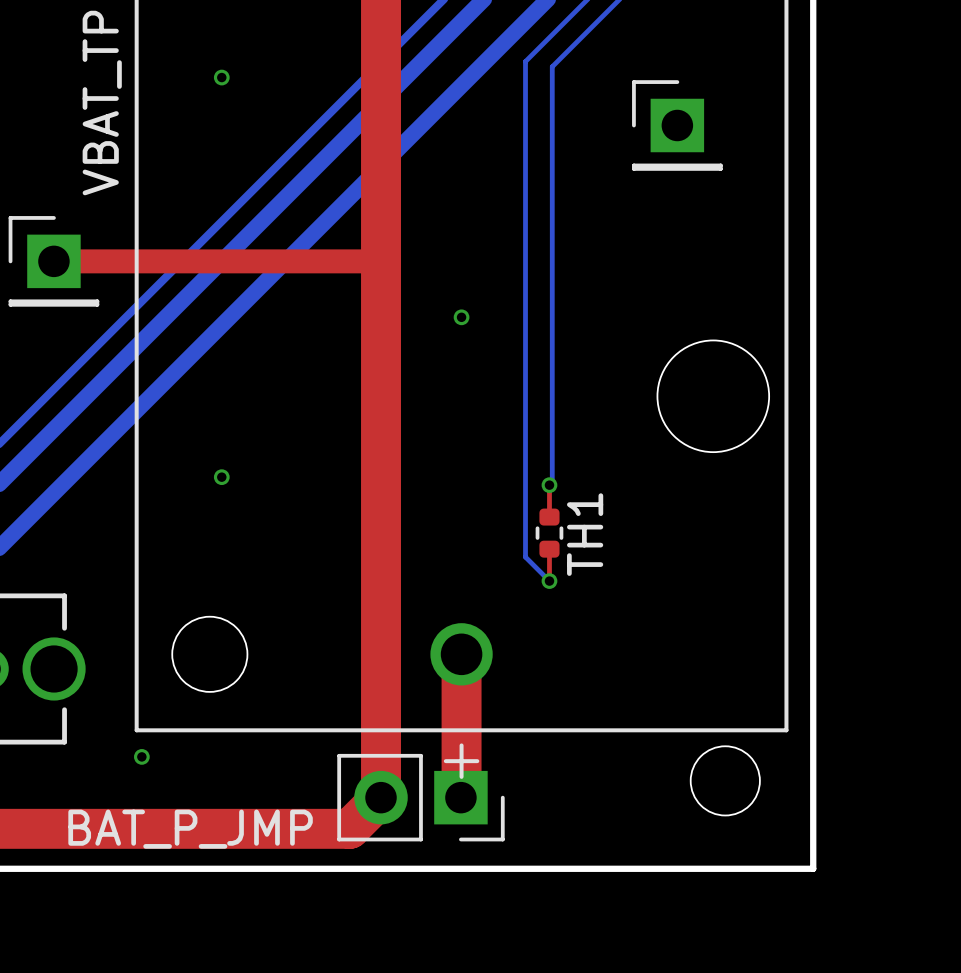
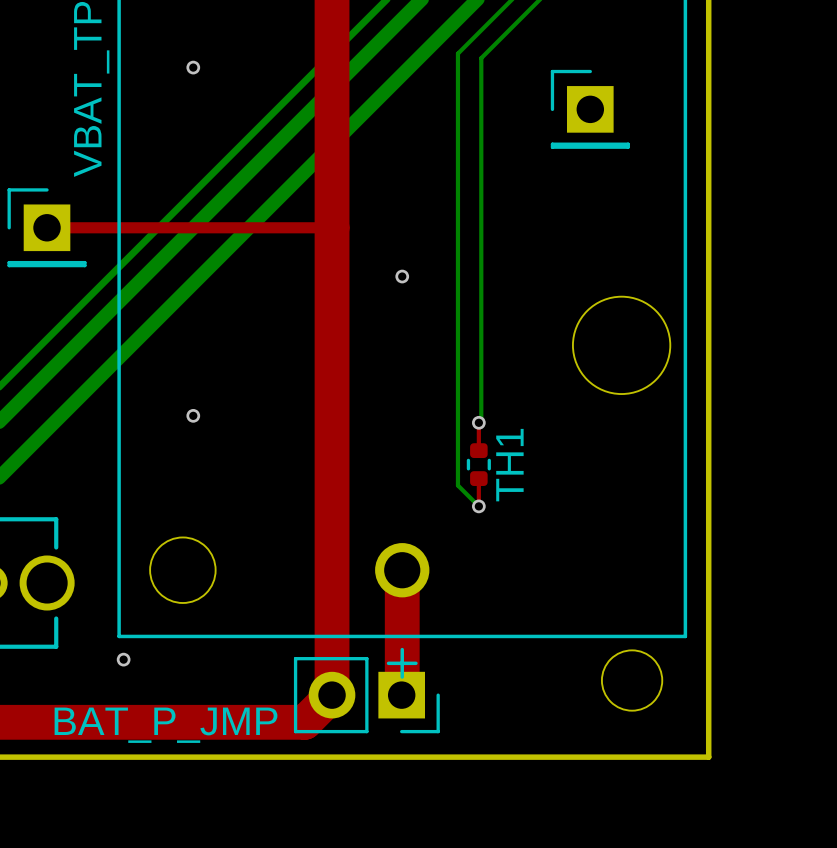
top track width: thick (53, 261) (381, 261) -> thin (47, 227) (332, 227)

